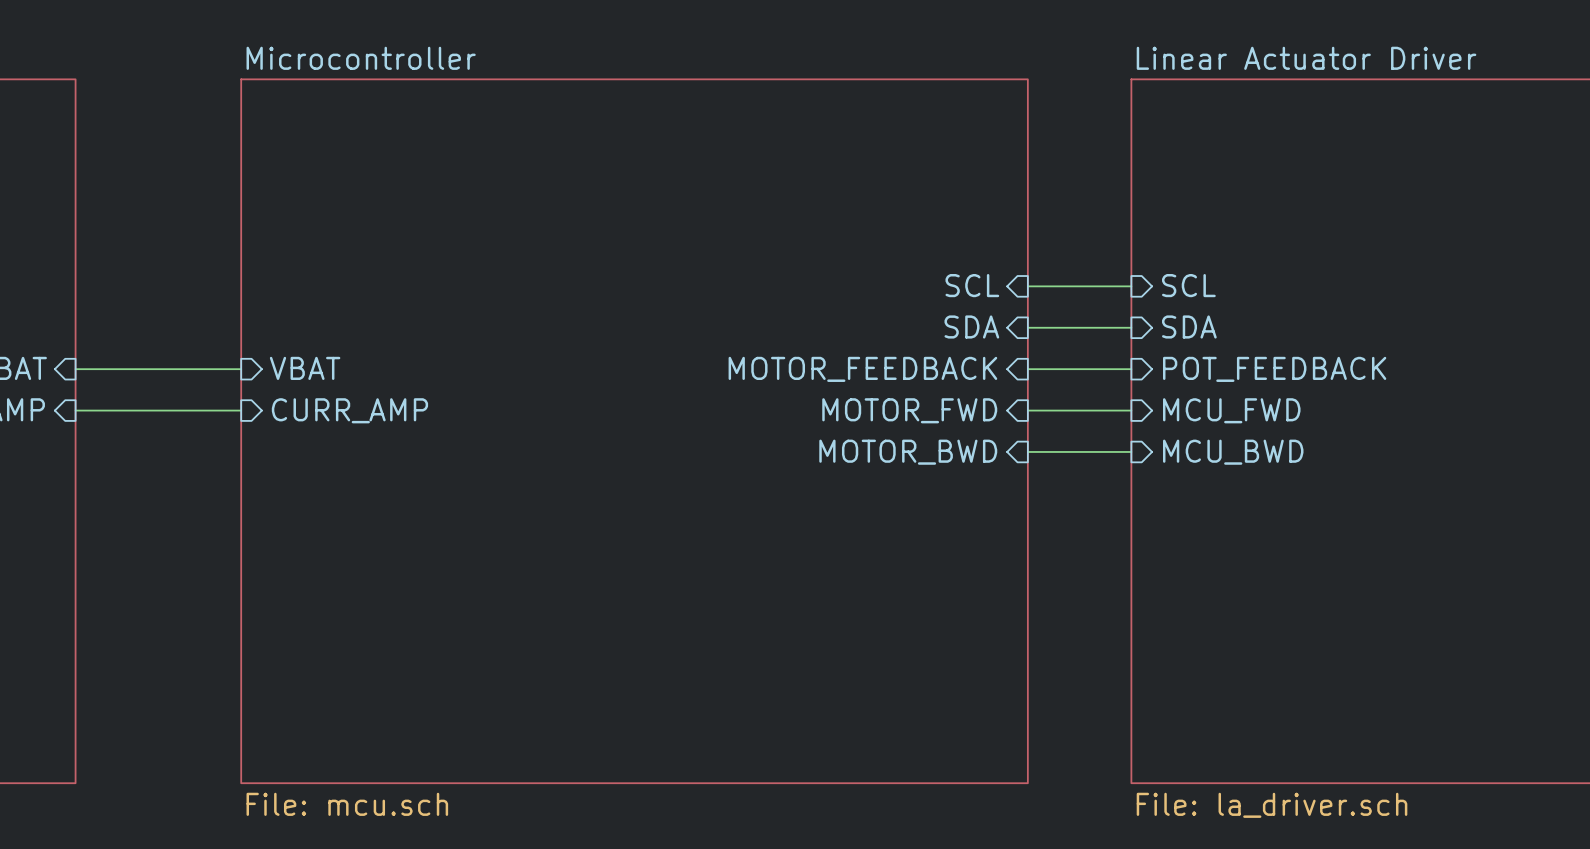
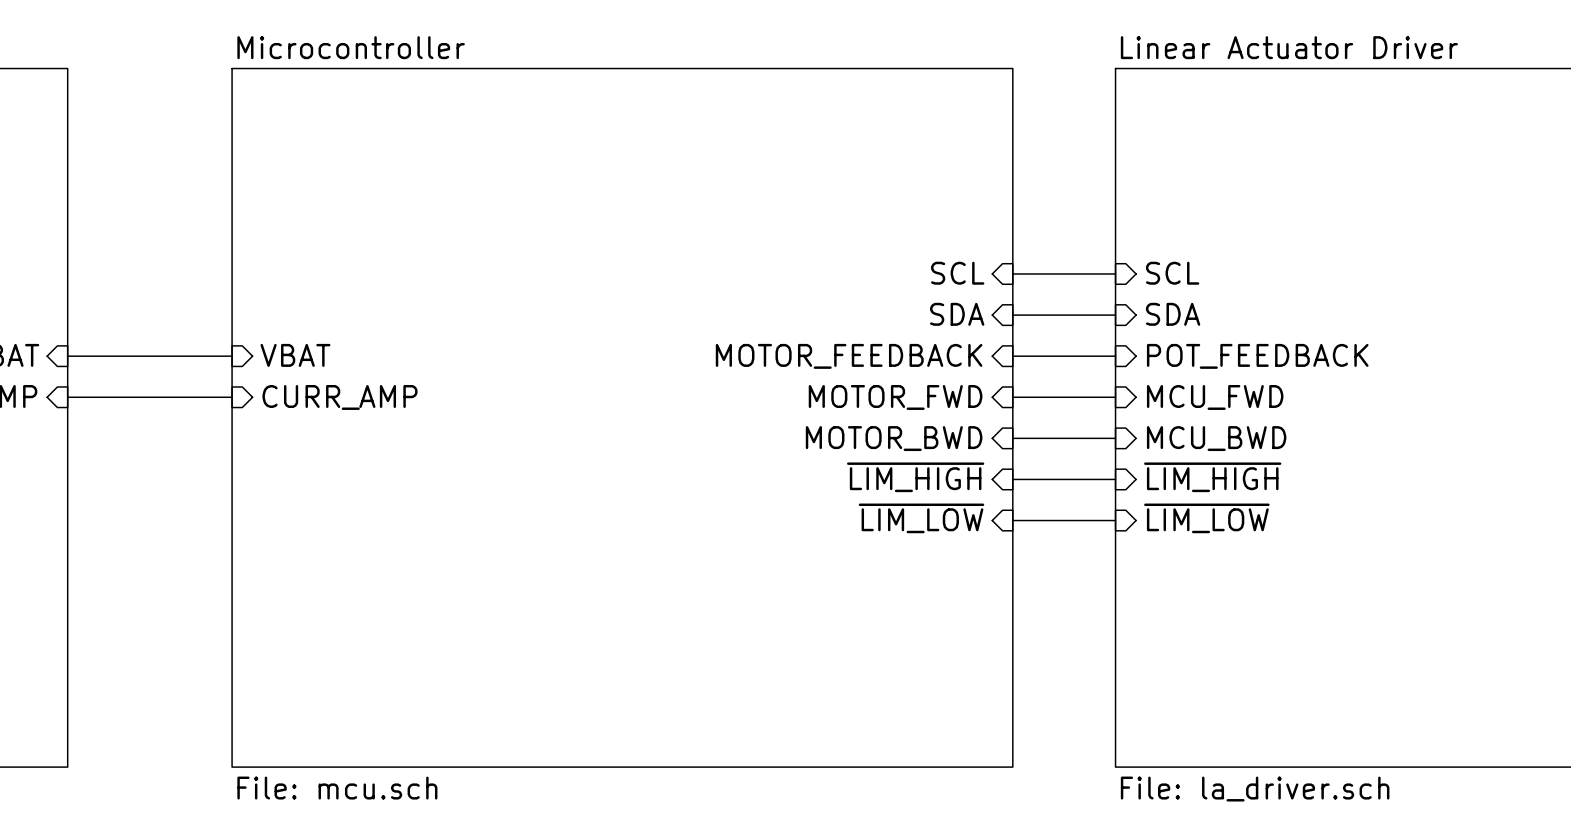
sheet pin: none -> ~{LIM_HIGH} (915, 477)
sheet pin: none -> ~{LIM_HIGH} (1212, 477)
wire: none -> (1012, 479) (1115, 479)
sheet pin: none -> ~{LIM_LOW} (921, 518)
sheet pin: none -> ~{LIM_LOW} (1206, 518)
wire: none -> (1012, 520) (1115, 520)

